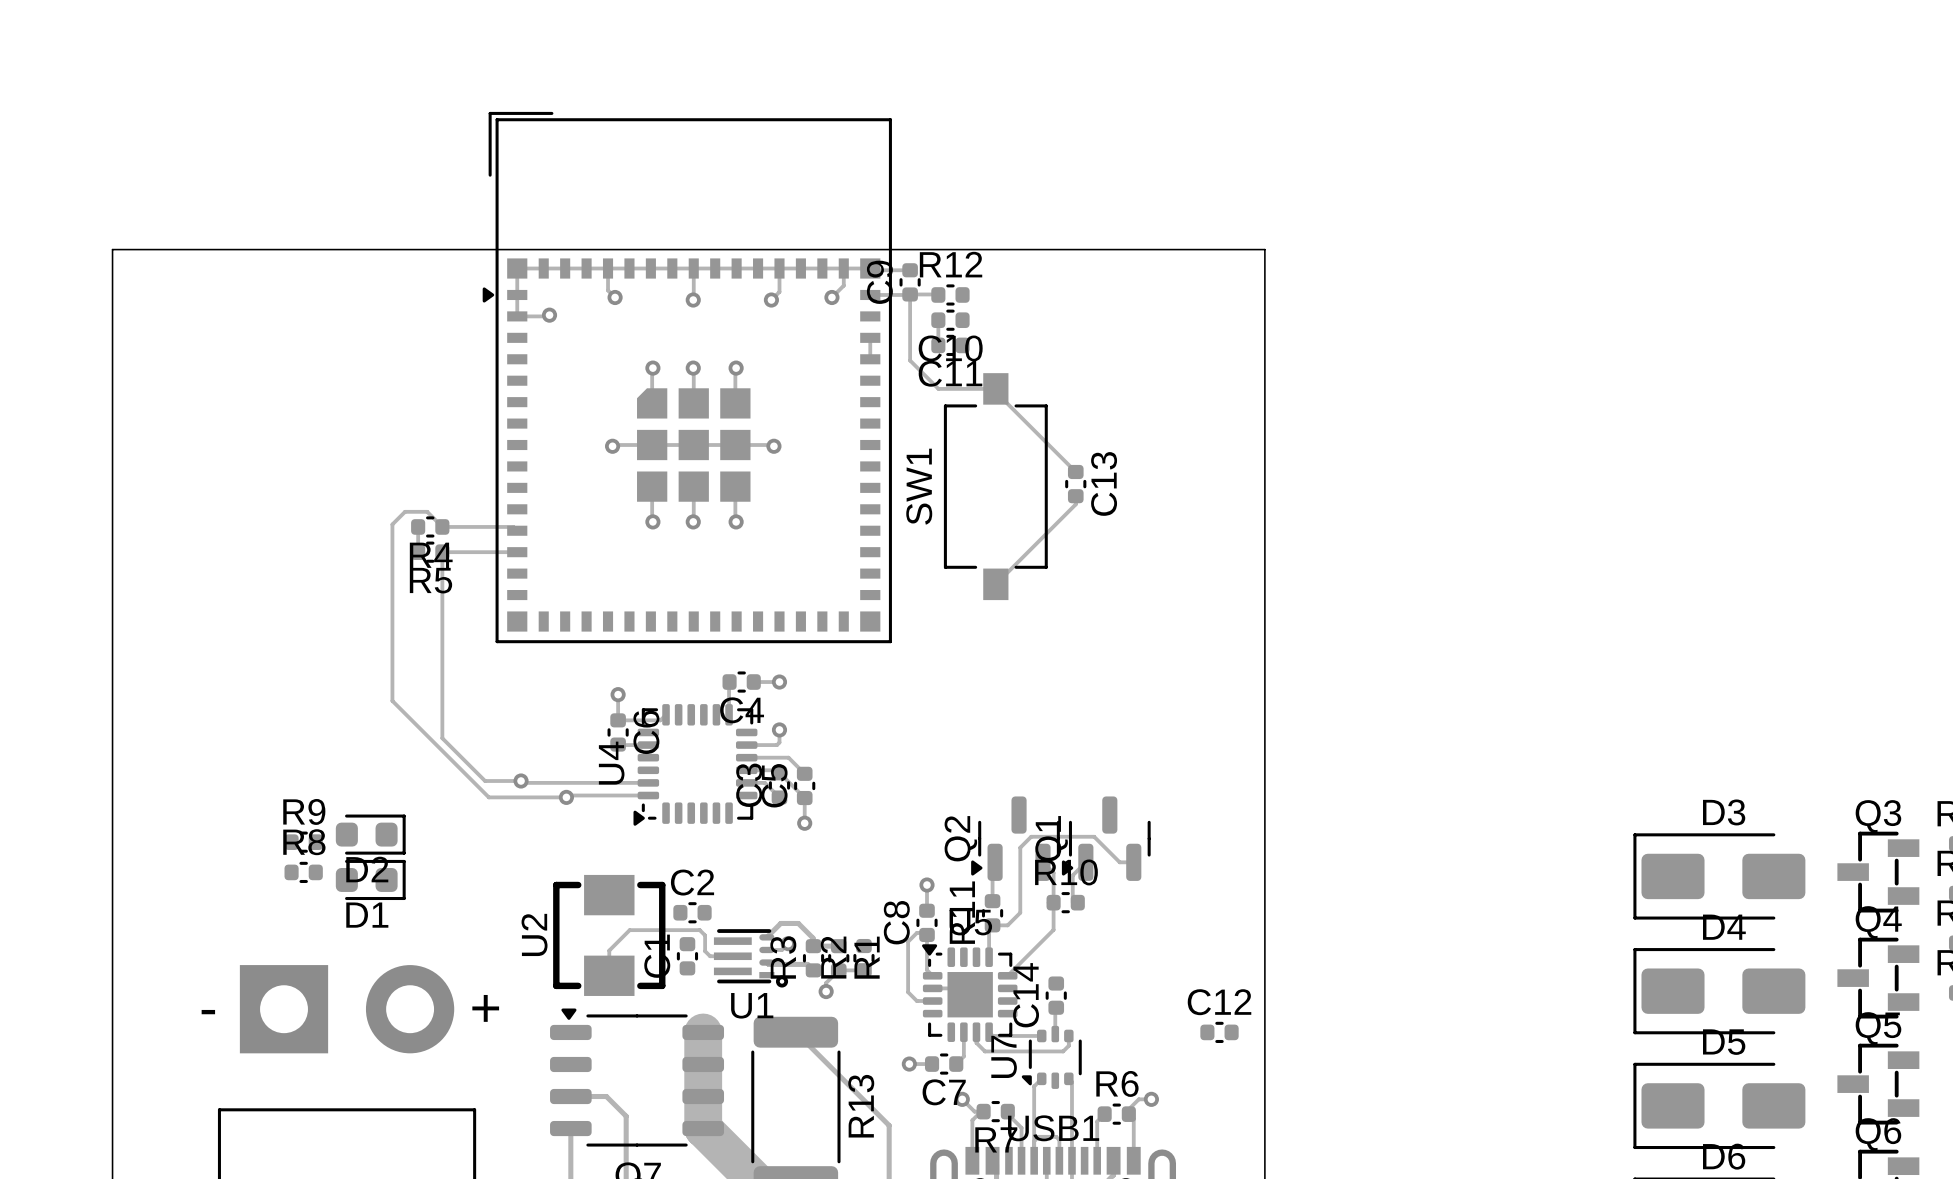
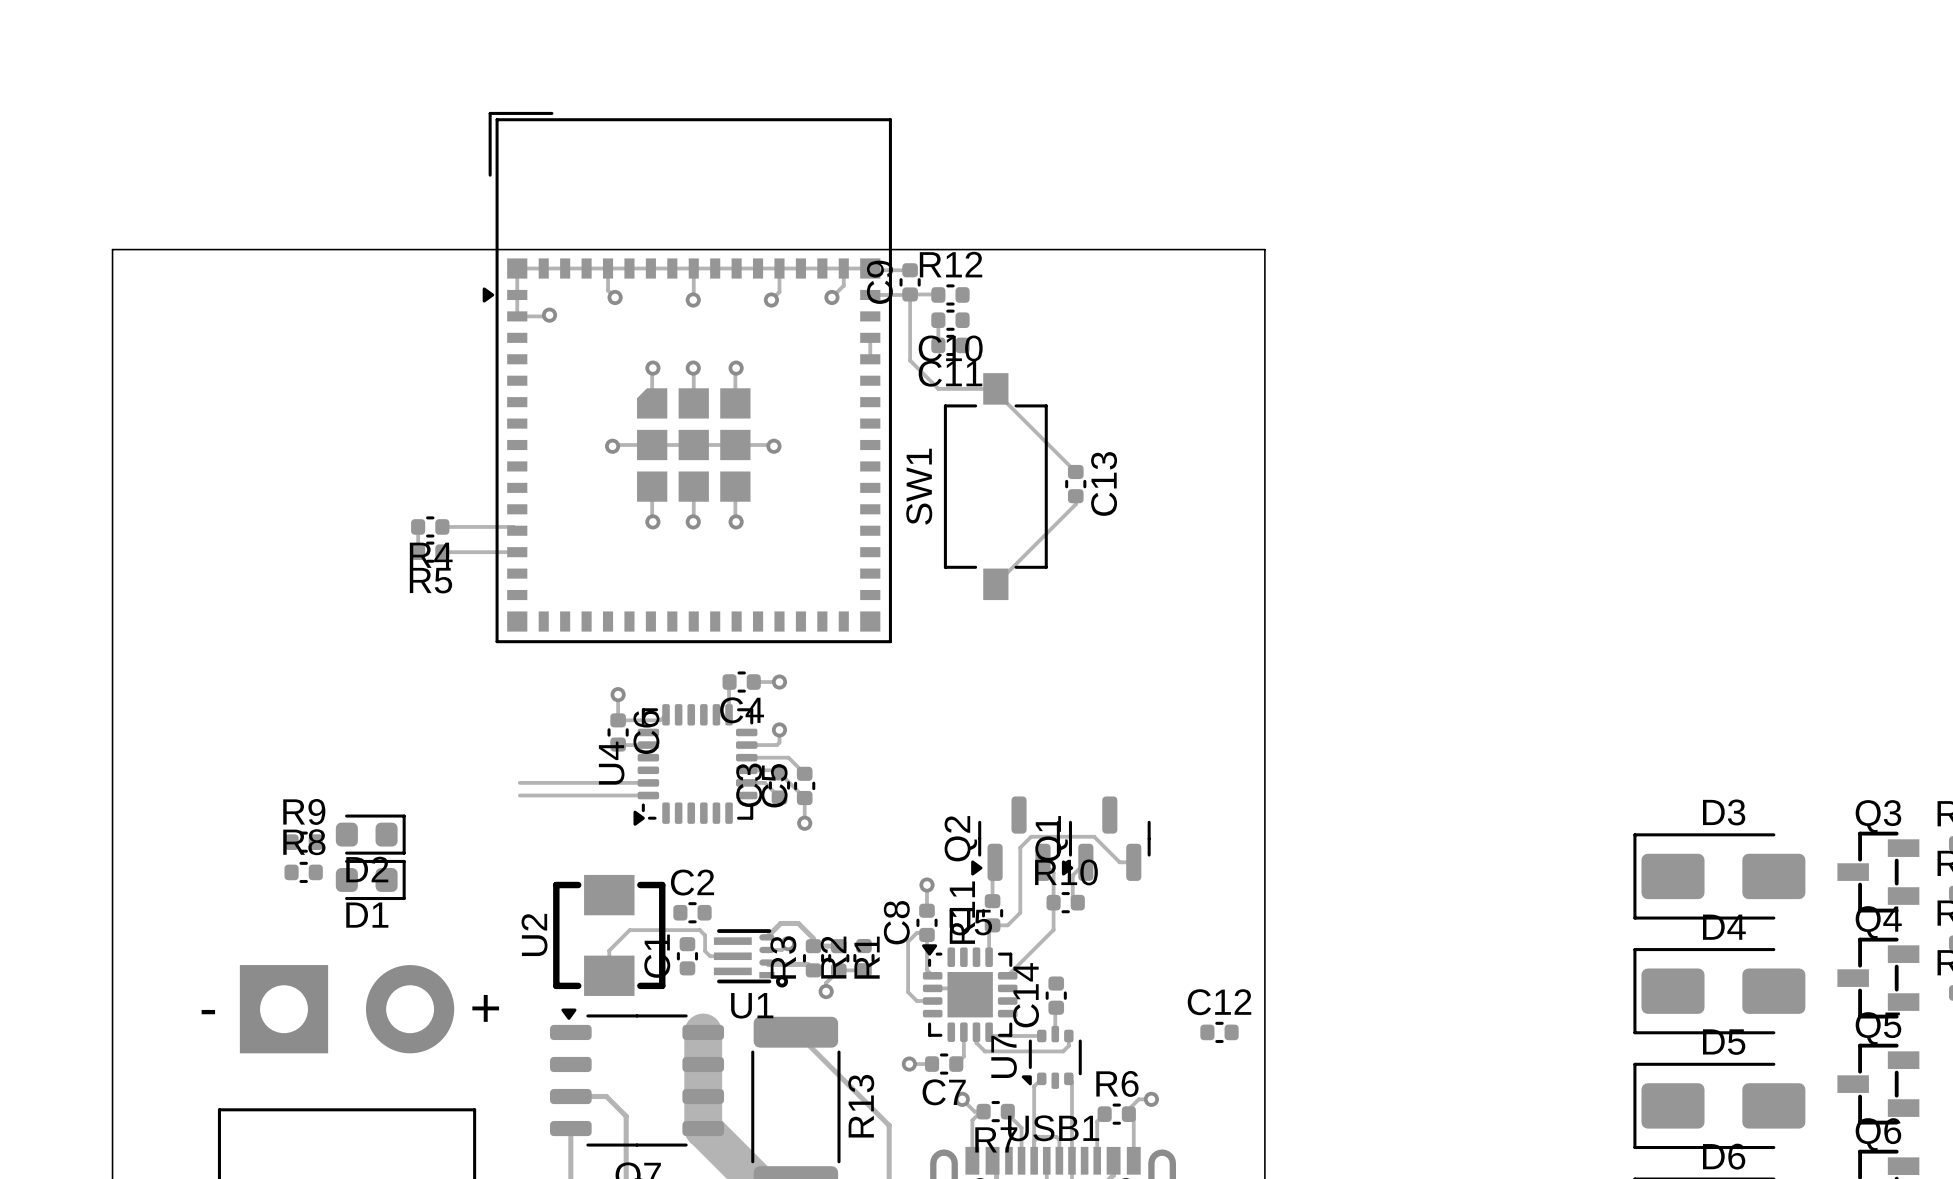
track: (442, 526) (427, 511) (405, 511) (392, 524) (392, 700) (488, 797) (566, 797) (568, 795) -> (519, 795) (568, 795)
track: (442, 552) (442, 738) (485, 781) (521, 781) -> none
via: (521, 781) -> none
via: (566, 797) -> none

